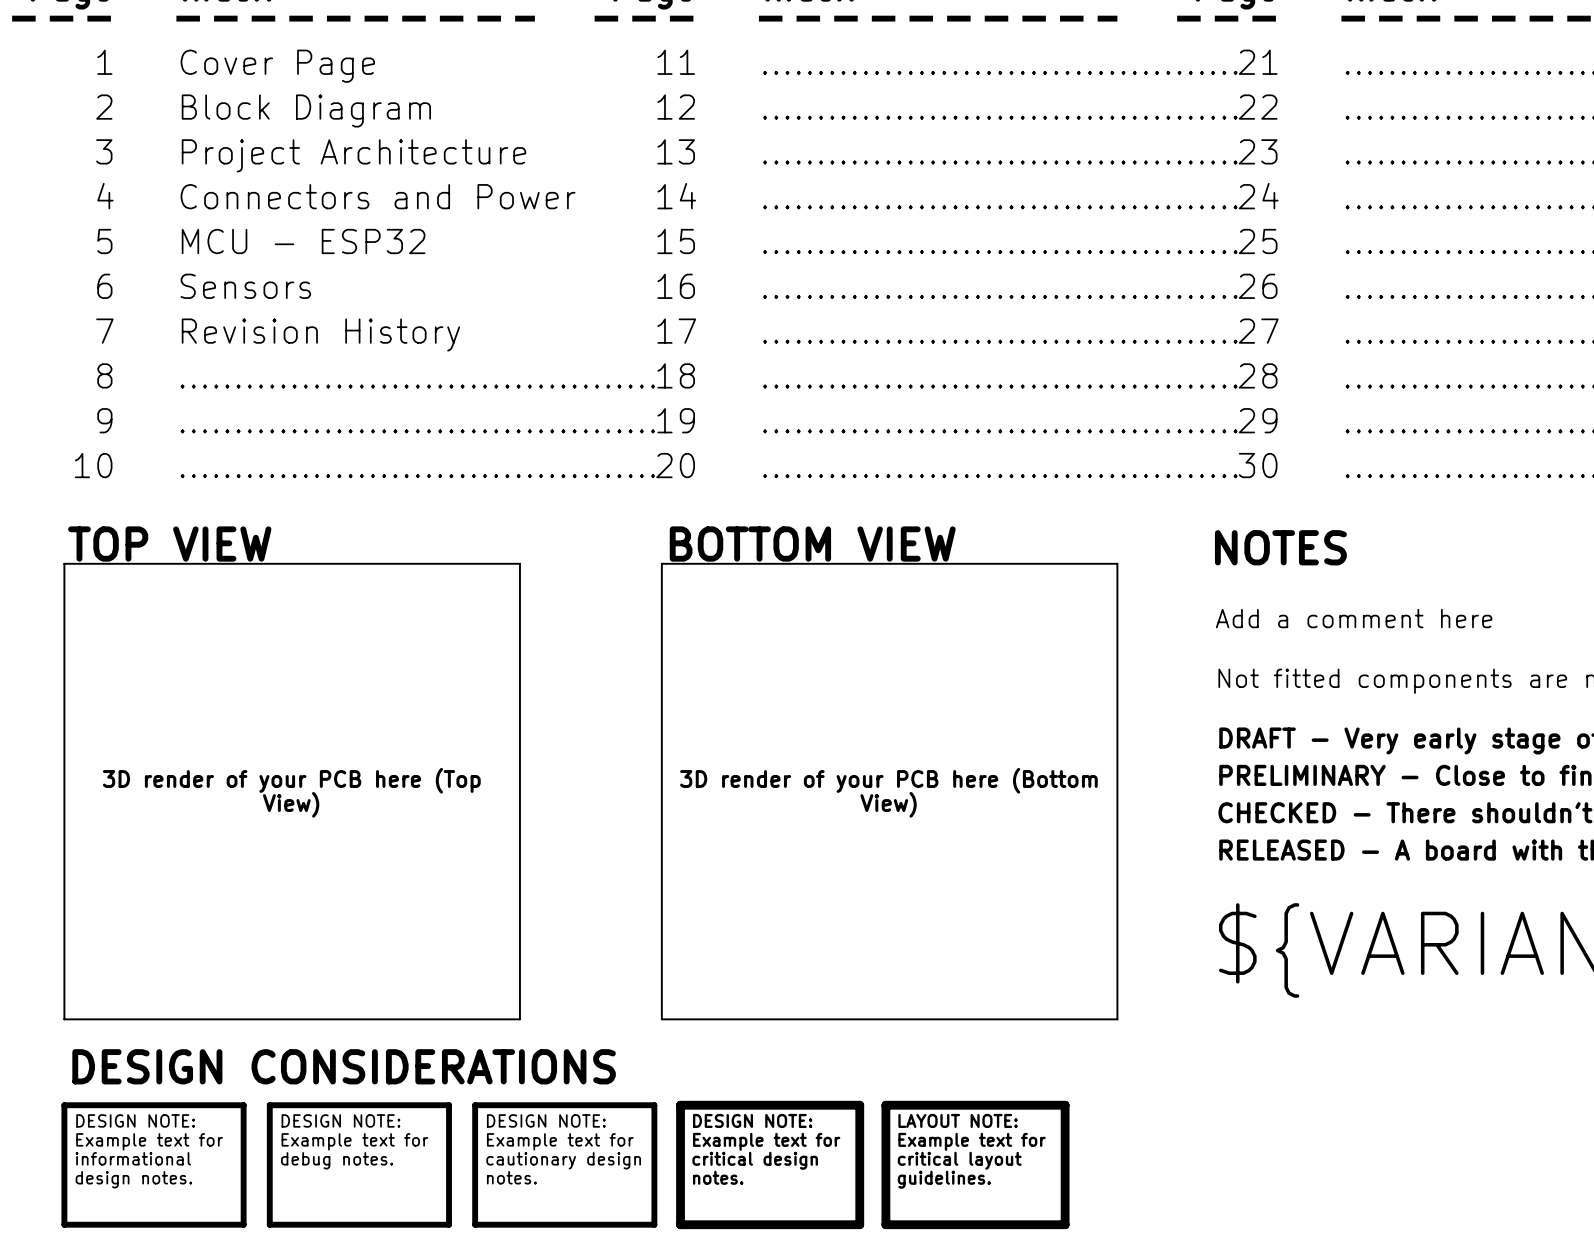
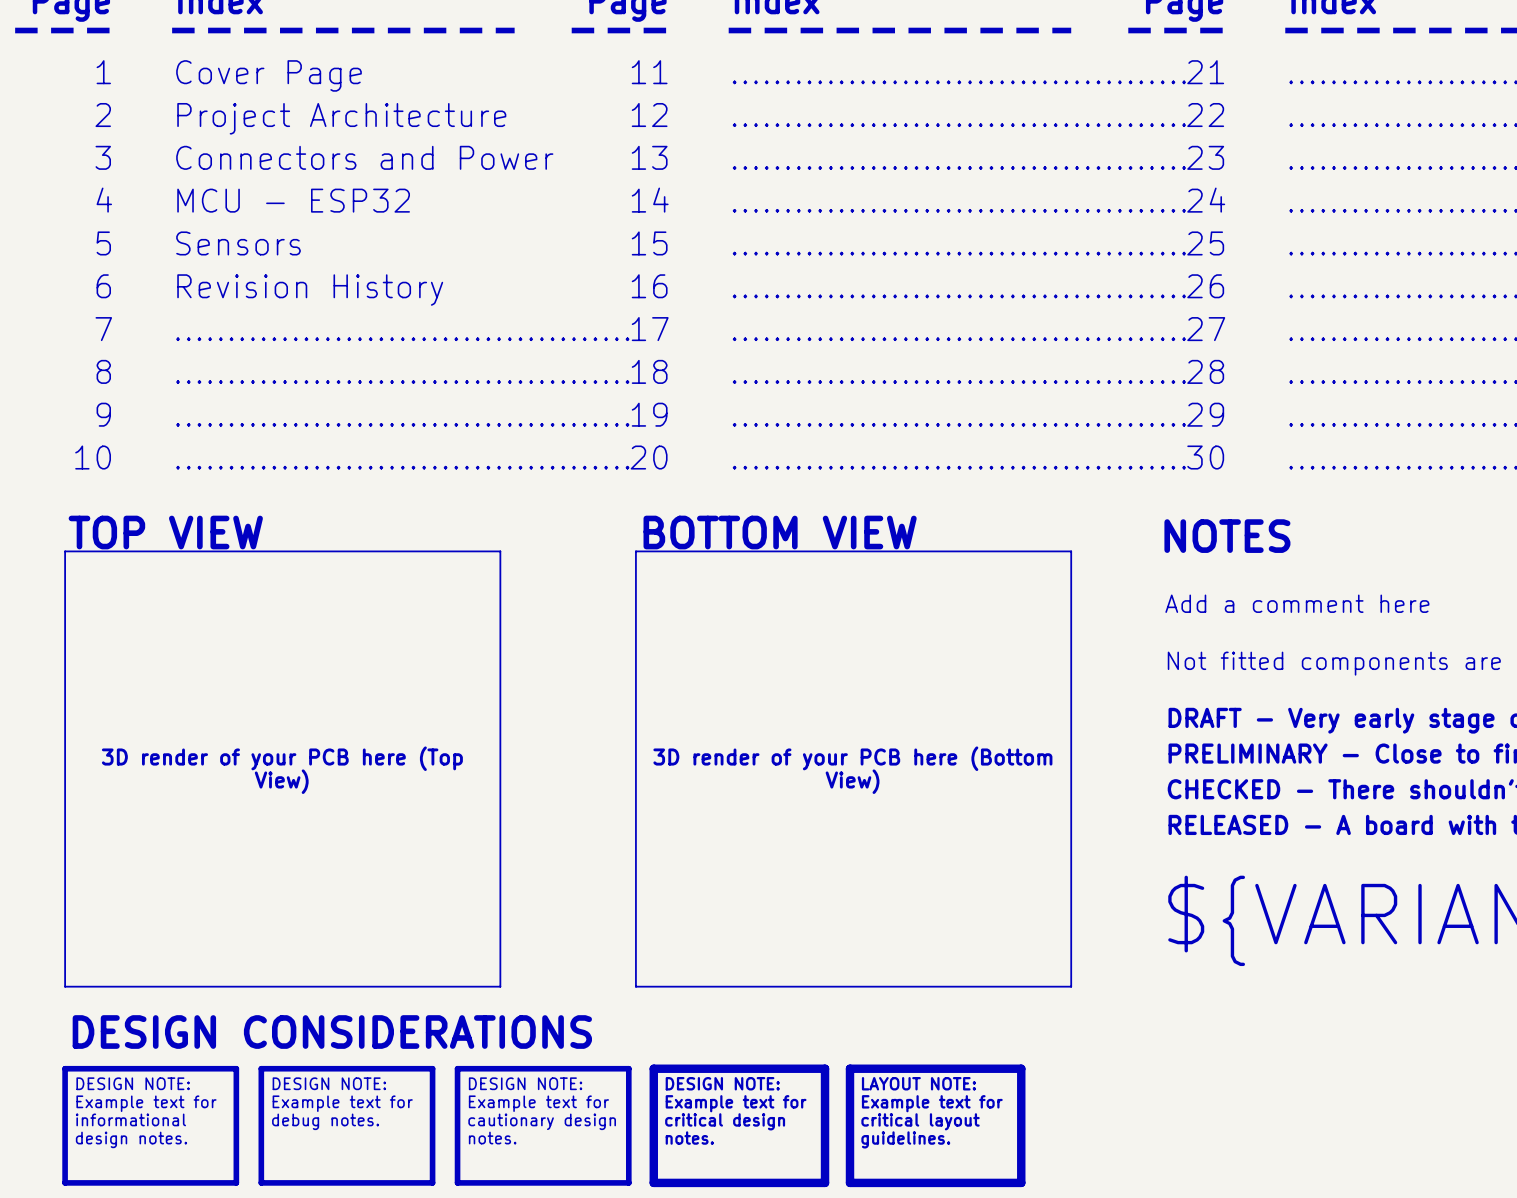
text: Block Diagram (306, 110) -> Project Architecture (341, 118)
text: Project Architecture (353, 155) -> Connectors and Power (364, 157)
text: Connectors and Power (378, 196) -> MCU - ESP32 (293, 200)
text: MCU - ESP32 (303, 241) -> Sensors (238, 243)
text: Sensors (245, 286) -> Revision History (310, 290)
text: Revision History (320, 335) -> ........................................... (402, 339)

